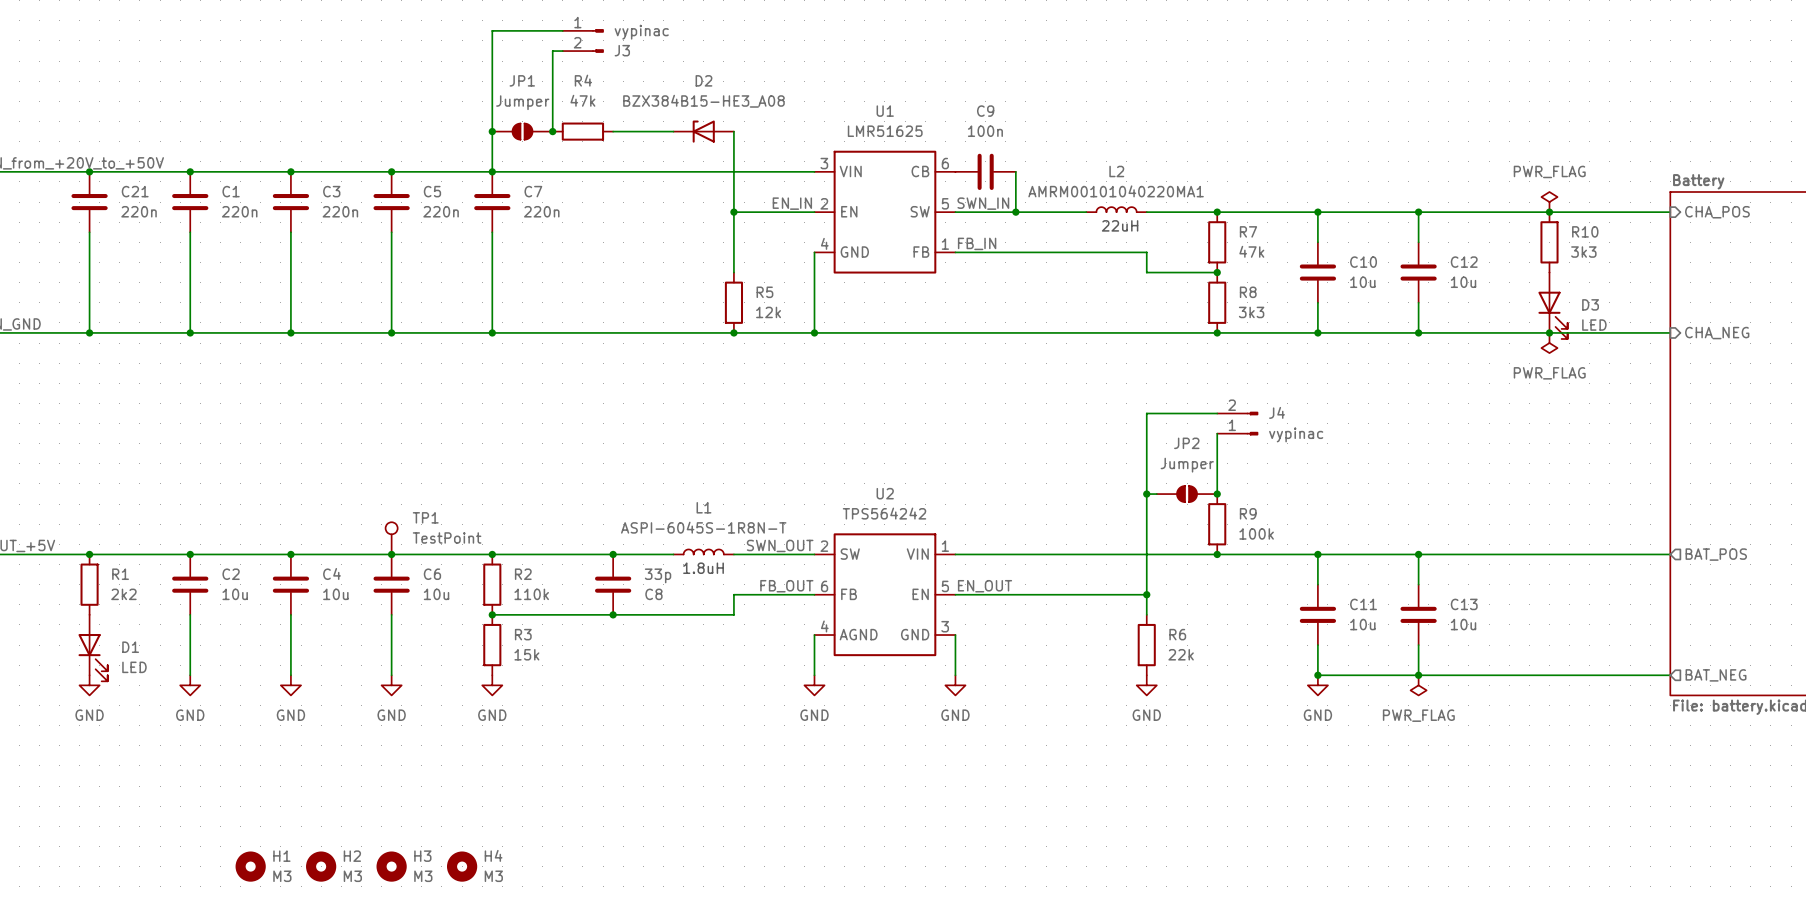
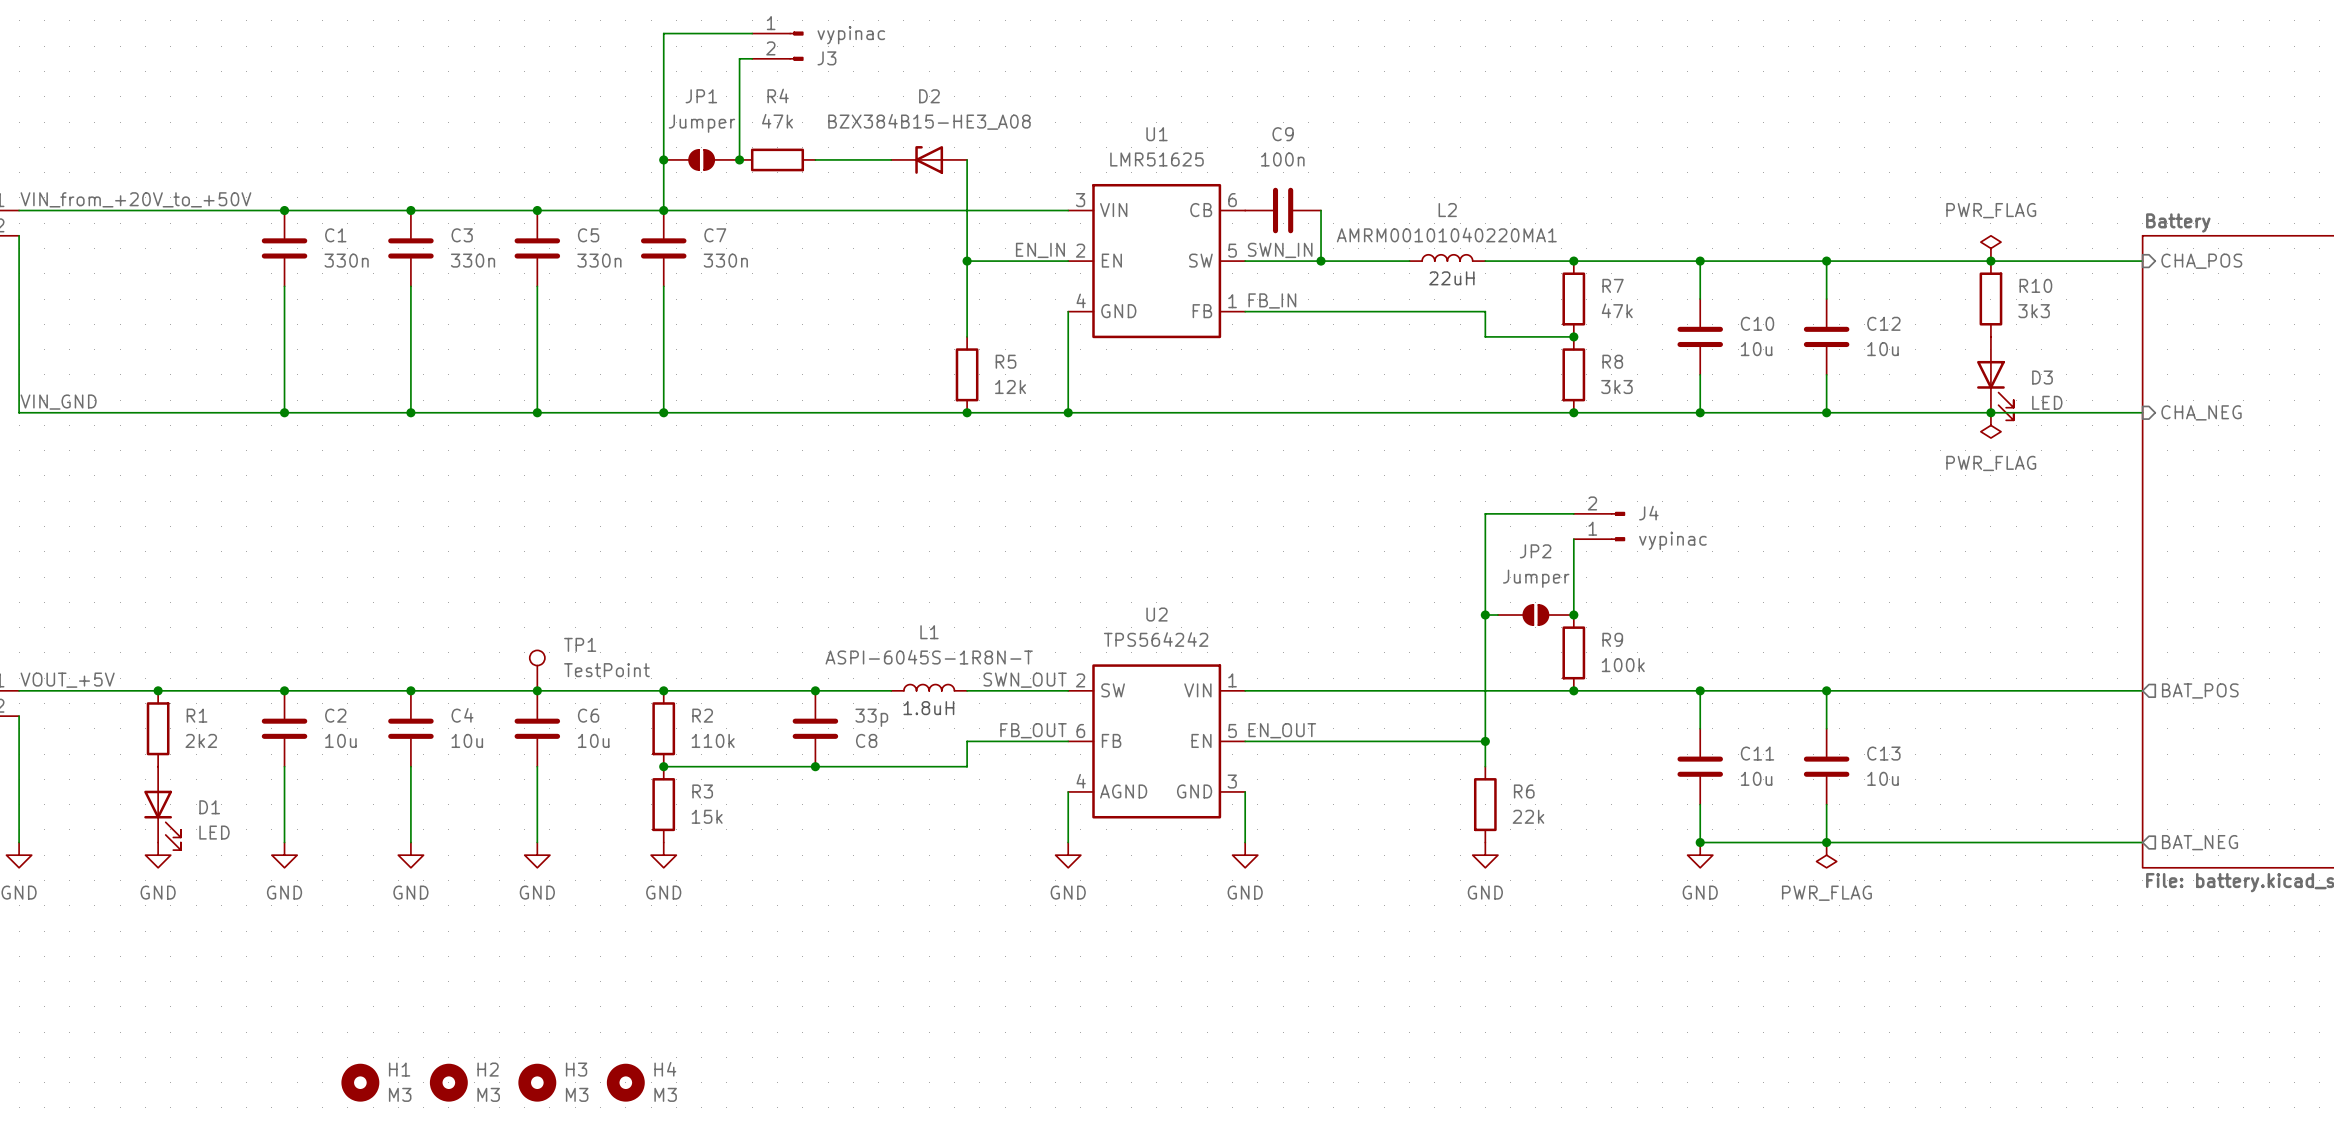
junction: (89, 171) -> none
C21: 220n (89, 202) -> none
C1 value: 220n (239, 211) -> 330n (346, 260)
C3 value: 220n (340, 211) -> 330n (473, 260)
C5 value: 220n (441, 211) -> 330n (599, 260)
C7 value: 220n (541, 211) -> 330n (725, 260)
wire: (89, 232) (89, 332) -> none
junction: (89, 332) -> none

